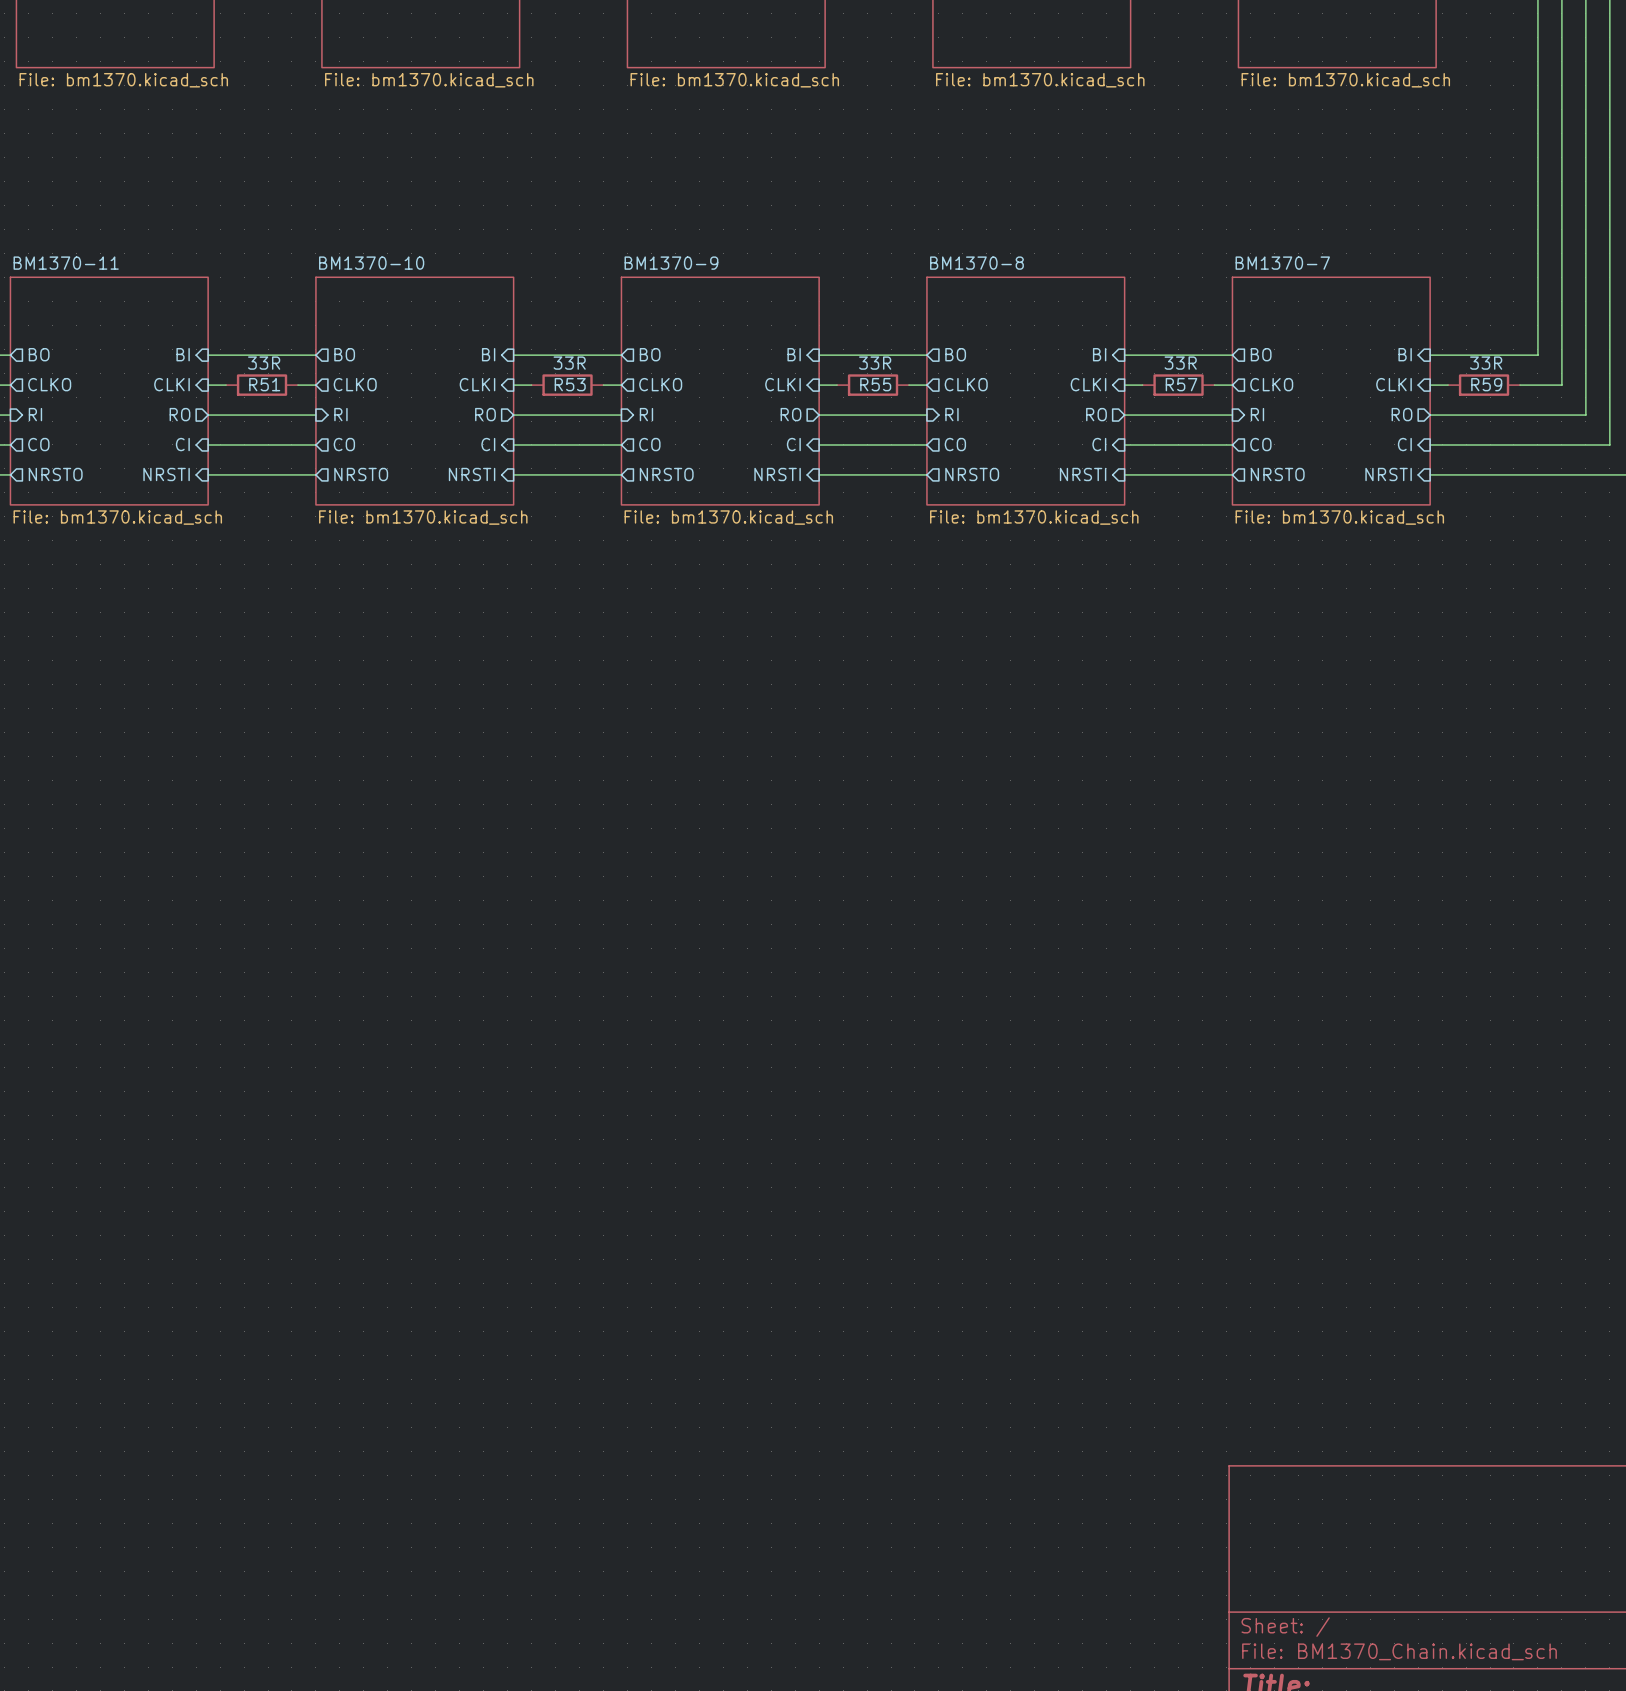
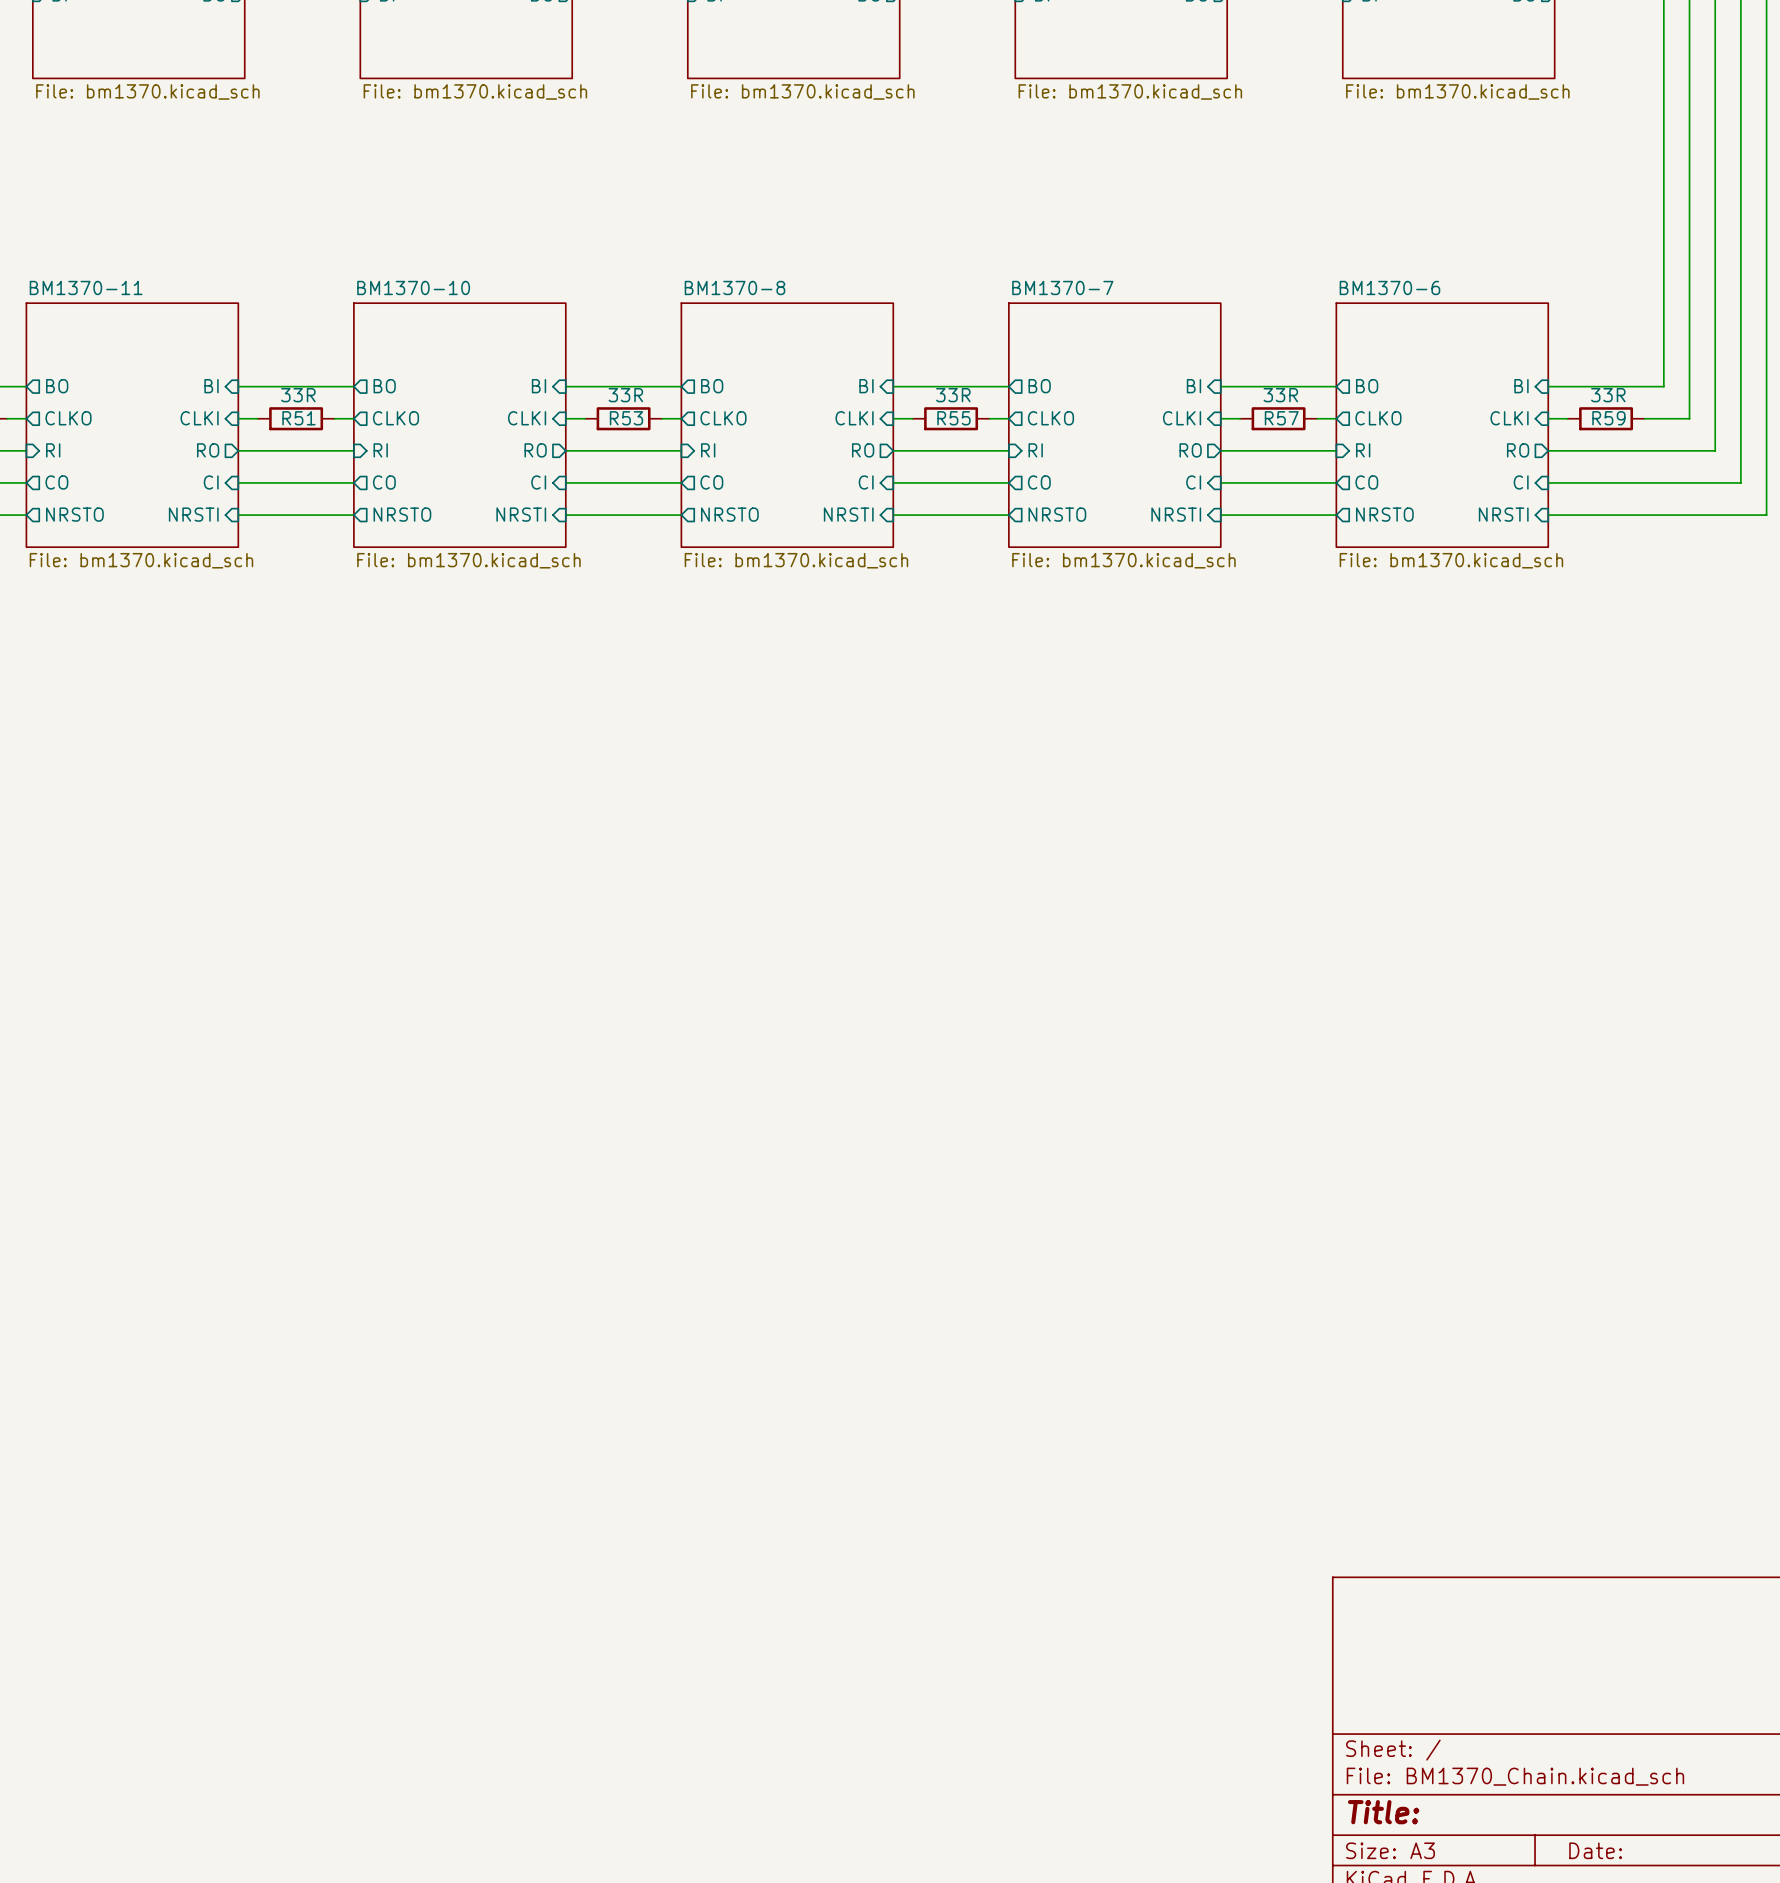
sheet BM1370-9 name: BM1370-9 (671, 263) -> BM1370-8 (734, 287)
sheet BM1370-8 name: BM1370-8 (976, 263) -> BM1370-7 (1062, 287)
sheet BM1370-7 name: BM1370-7 (1282, 263) -> BM1370-6 (1389, 287)

